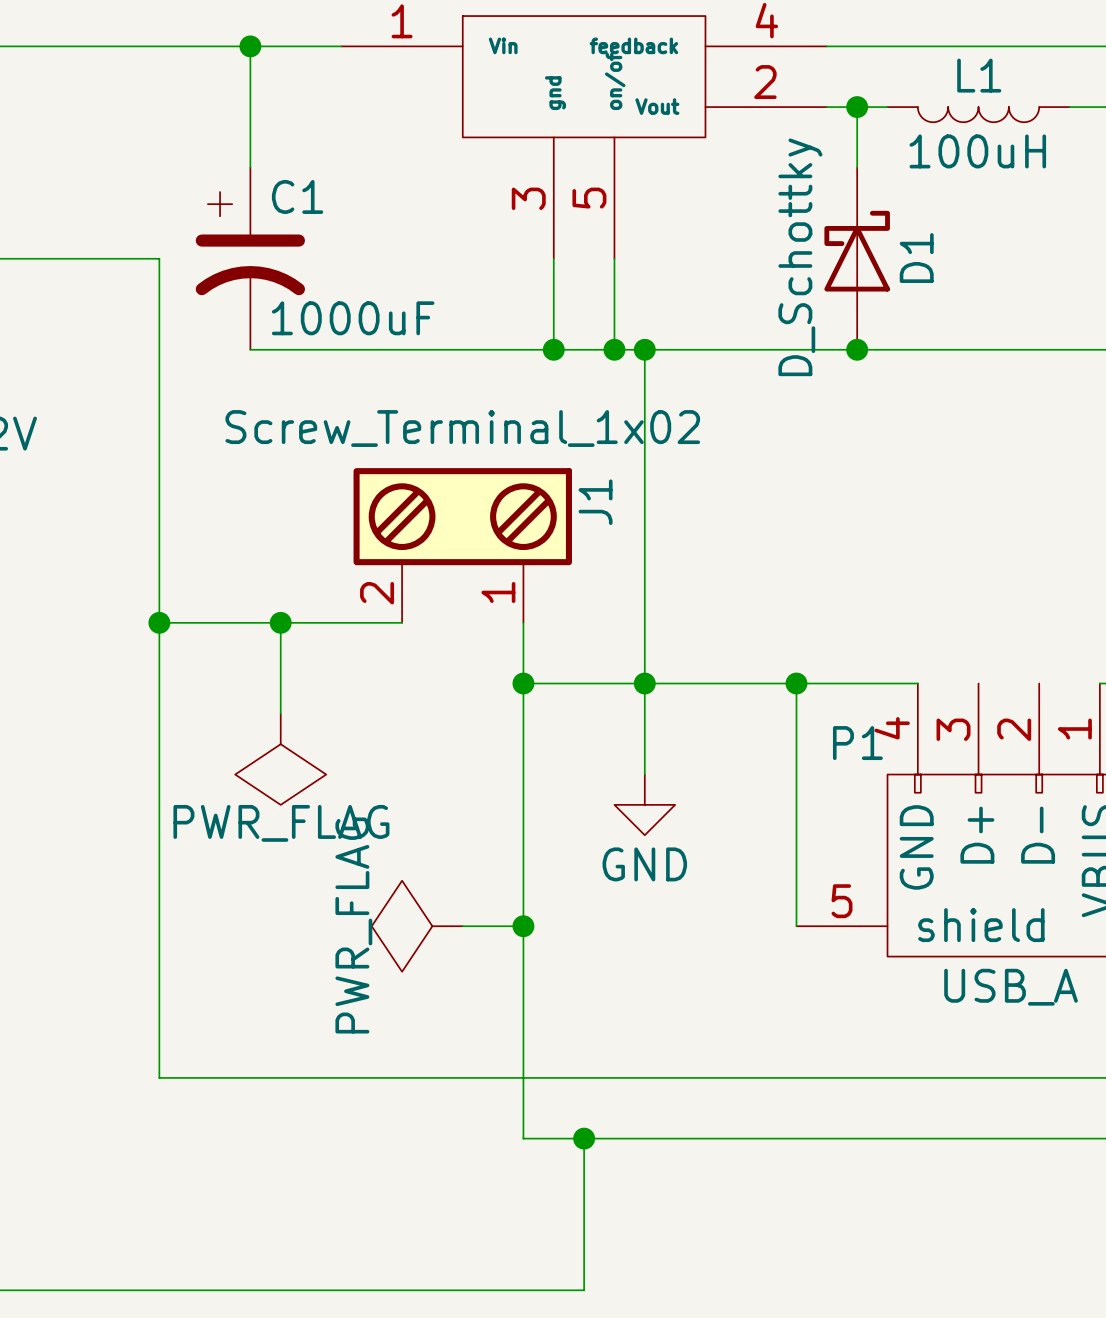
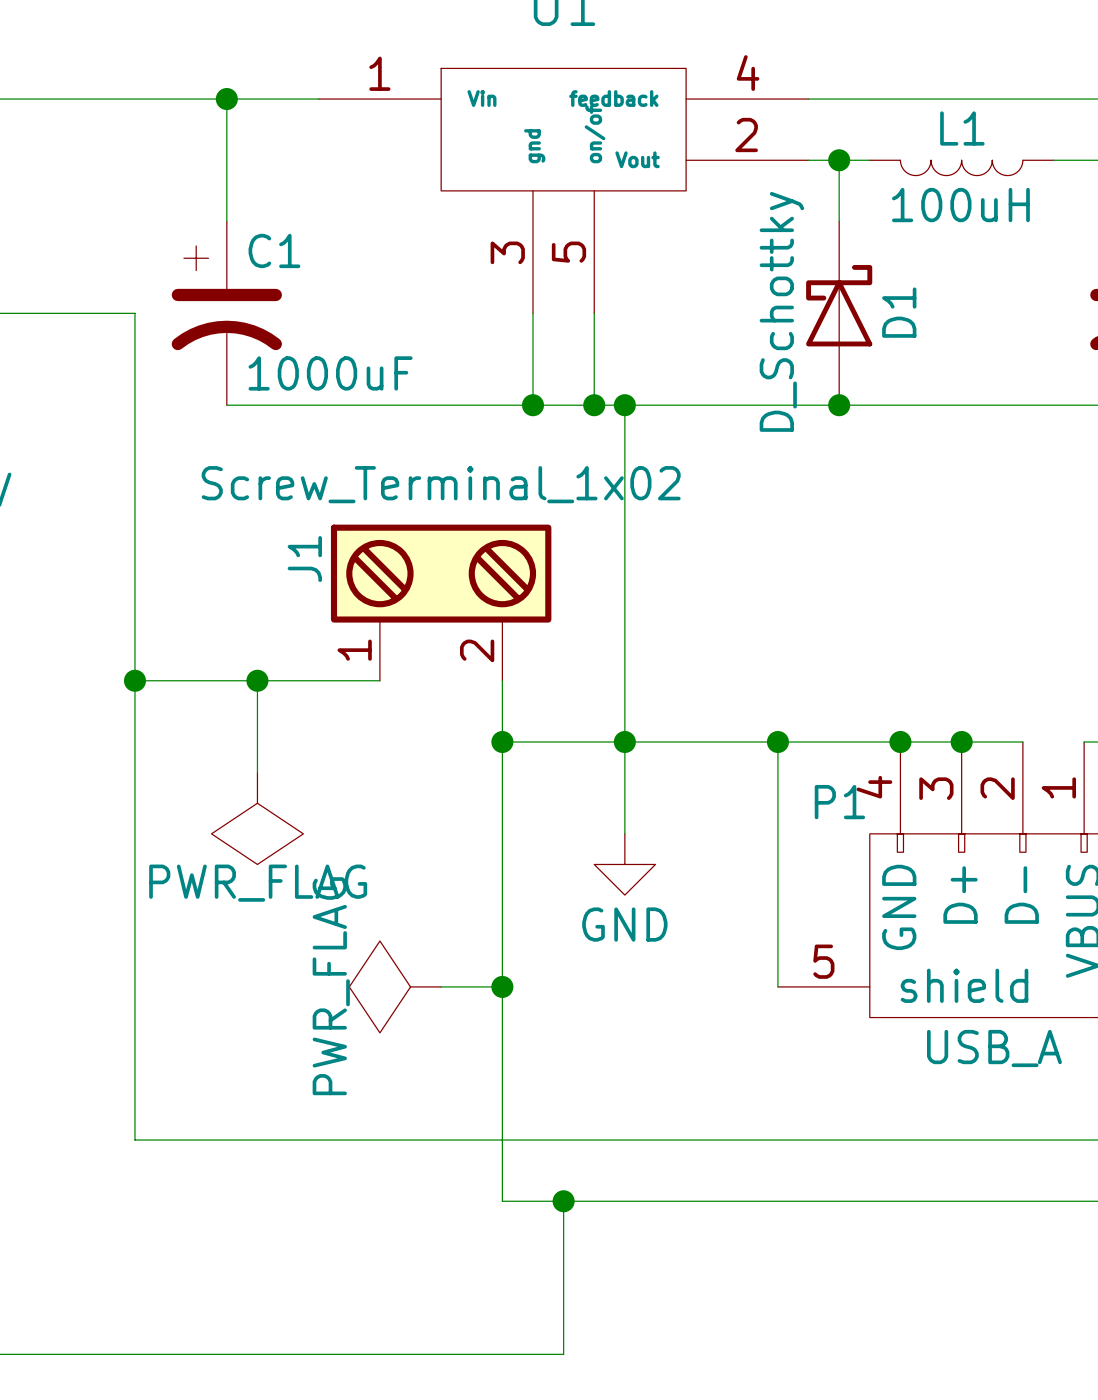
J1 flip: as is (462, 516) -> left-right (441, 573)
wire: none -> (900, 742) (1022, 742)
junction: none -> (900, 742)
junction: none -> (961, 742)

